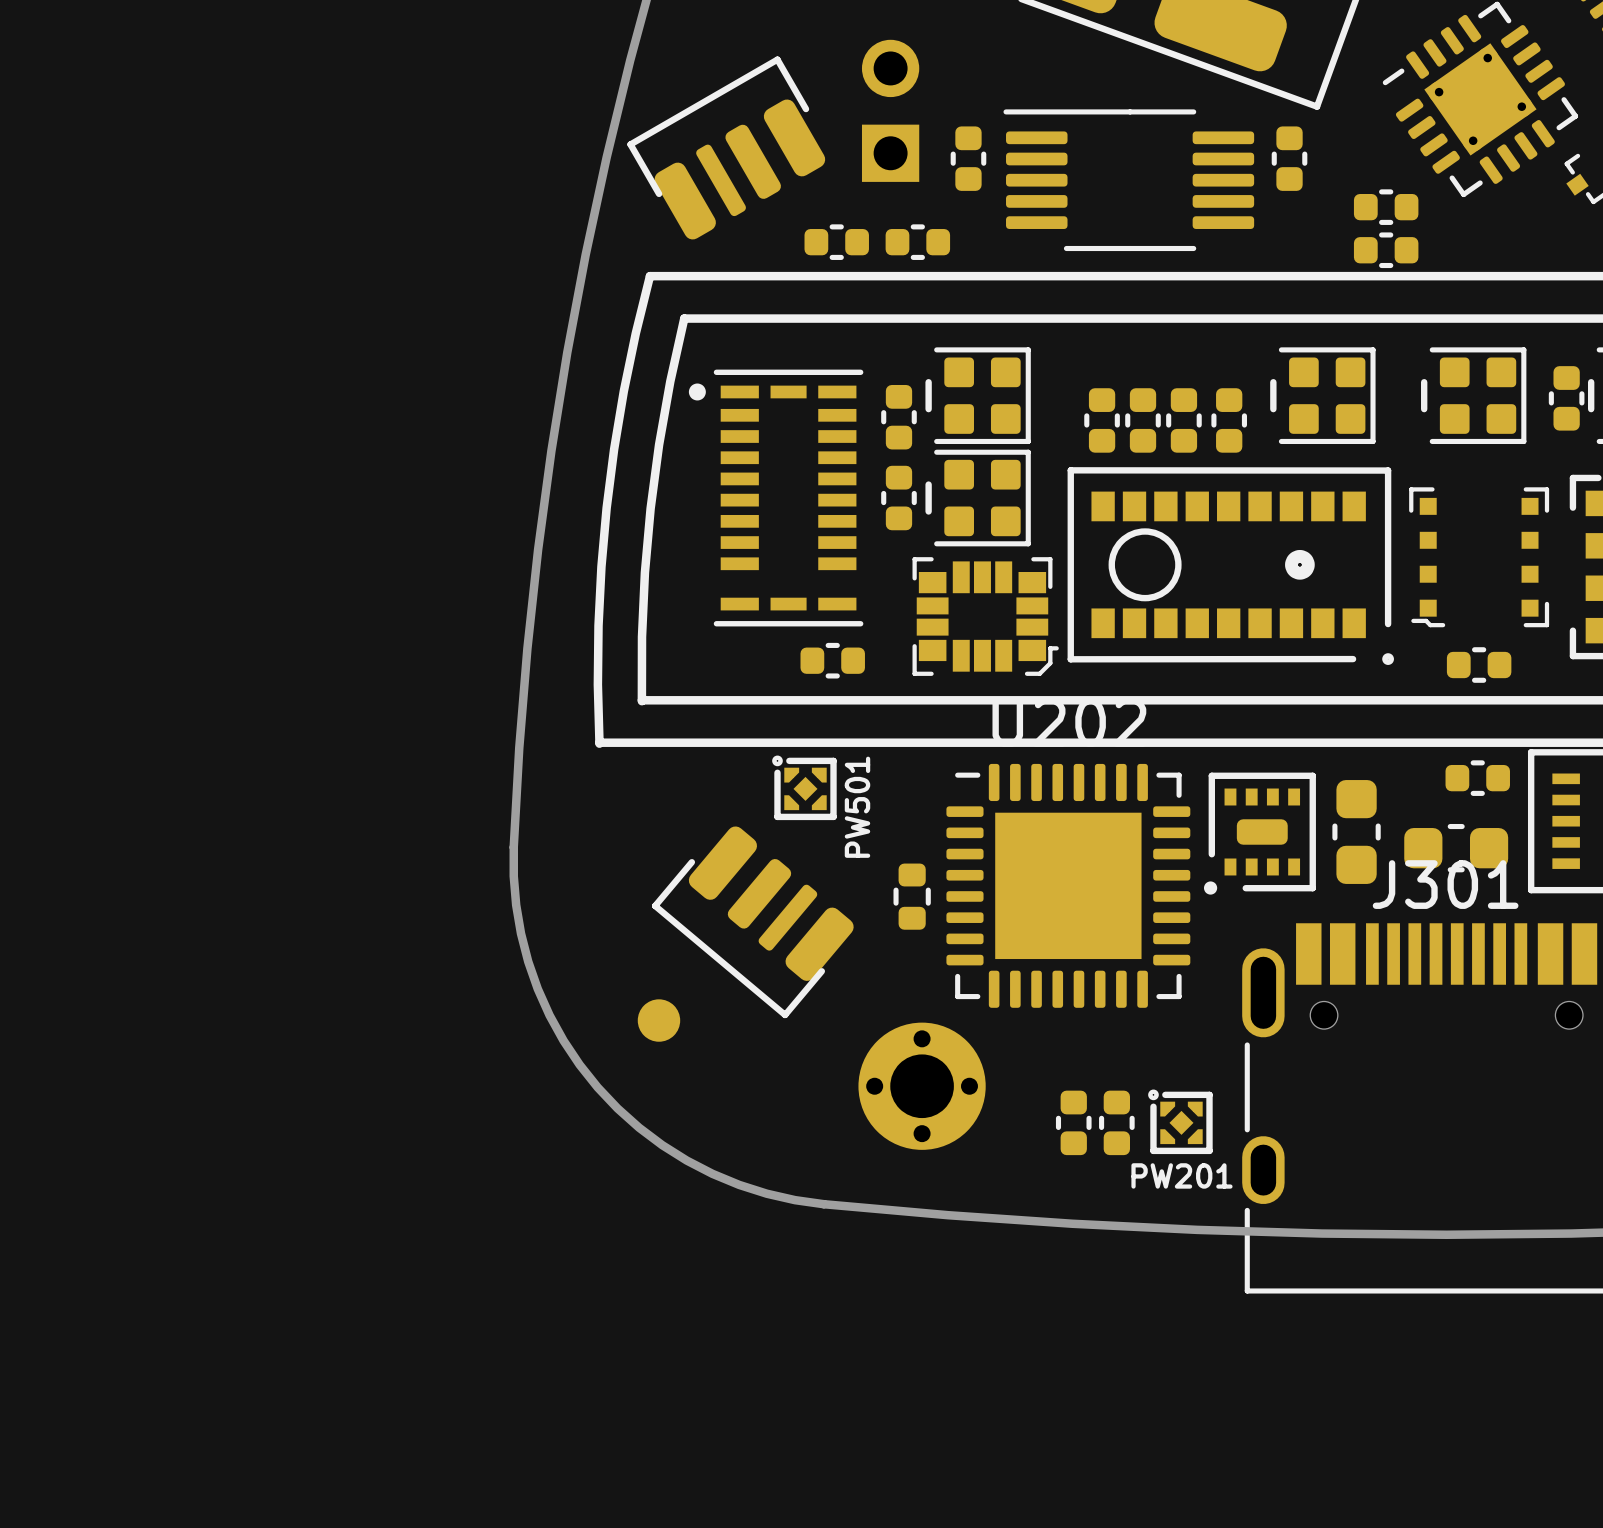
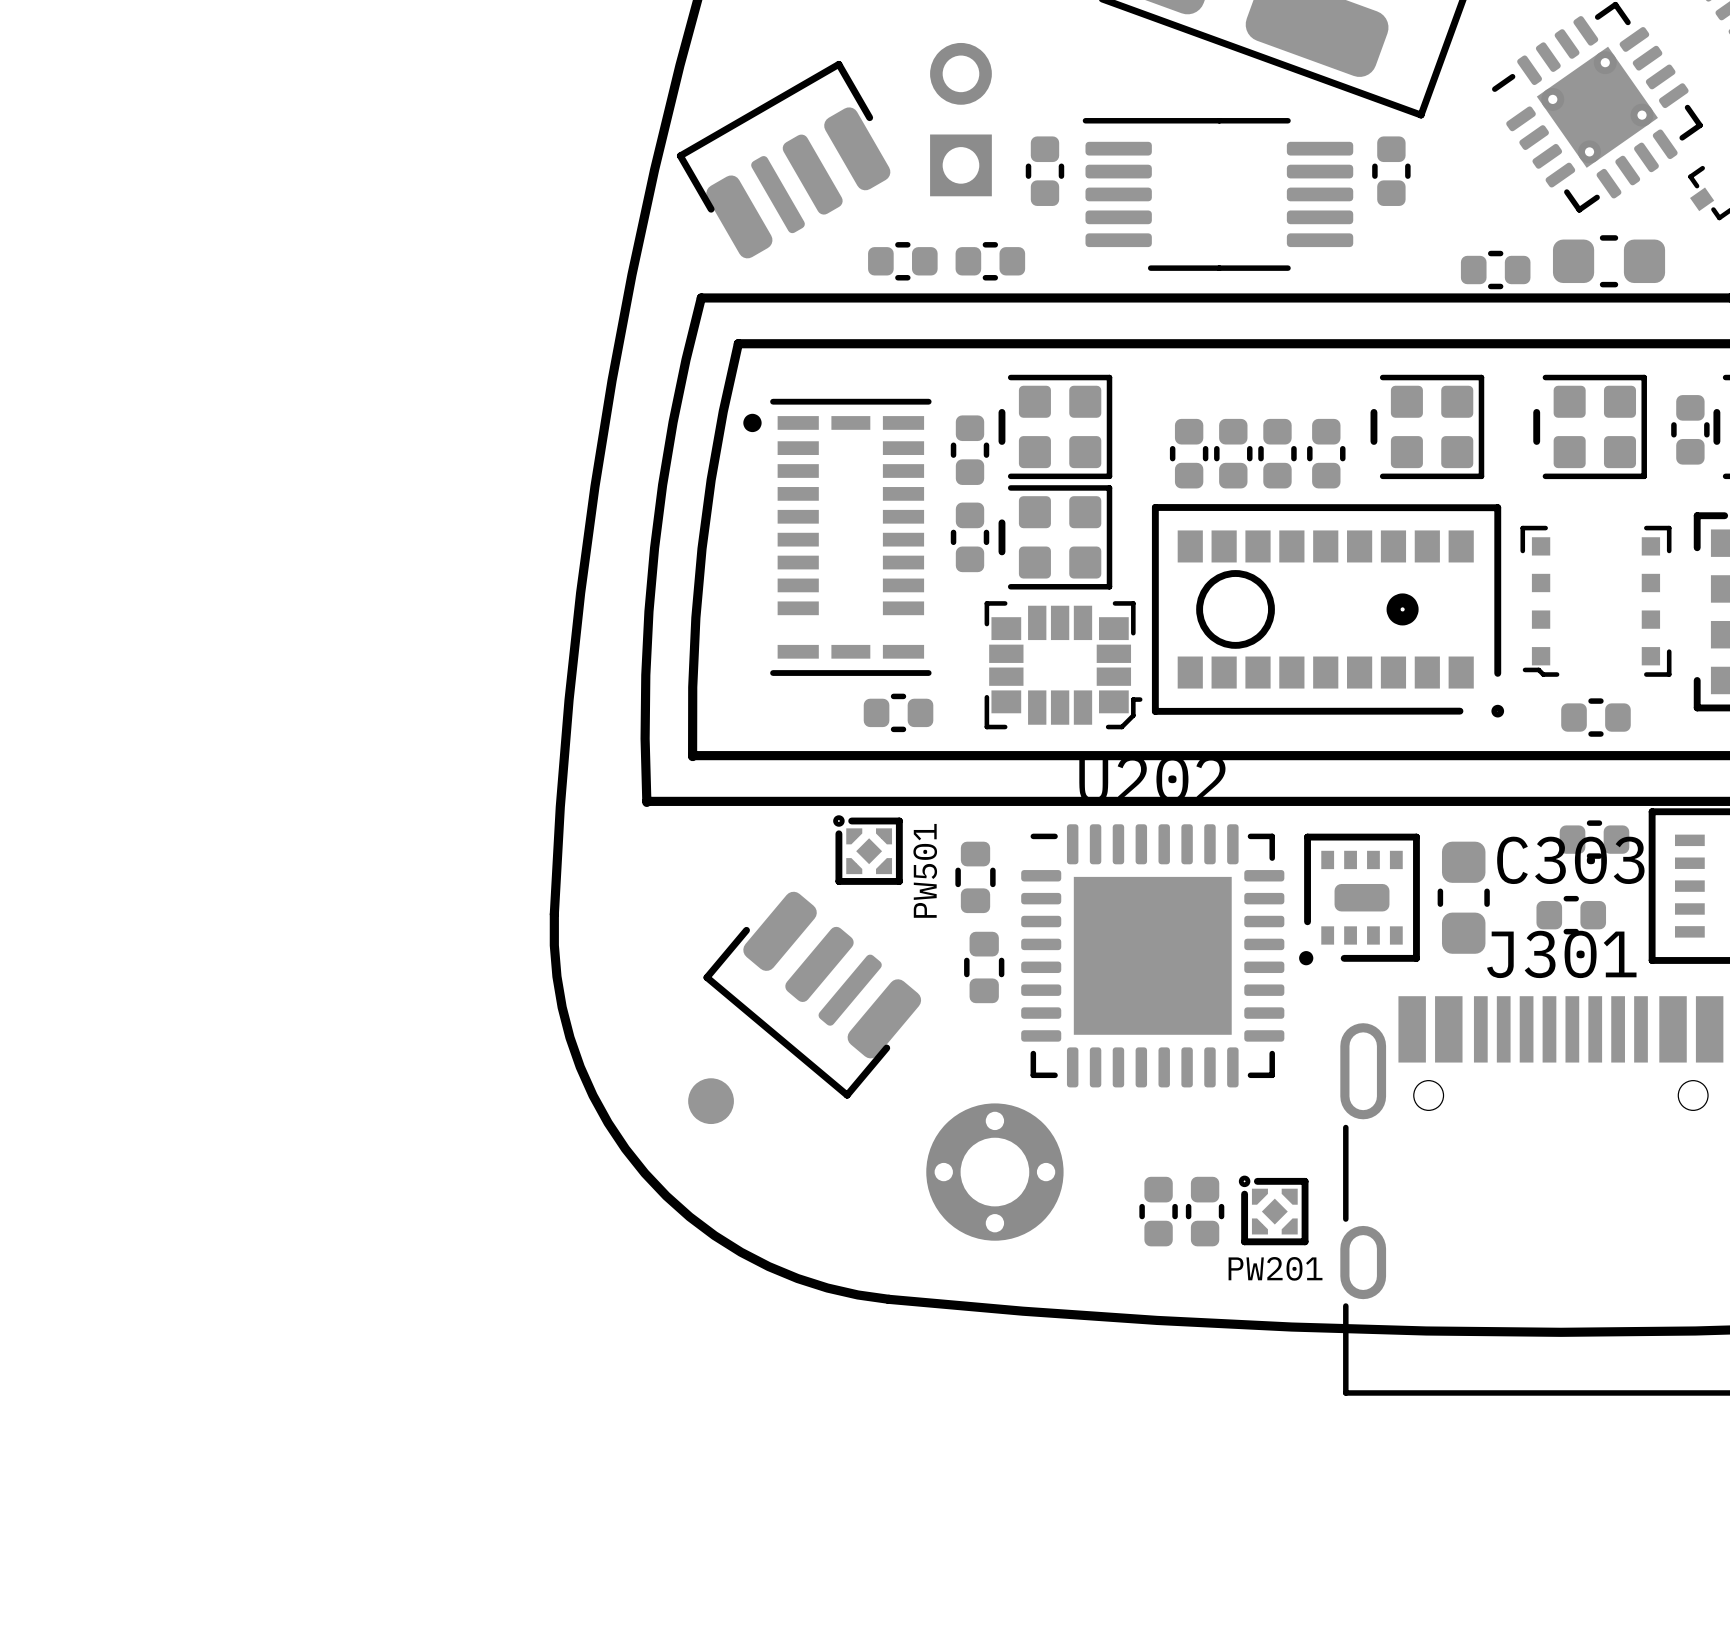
part: (1386, 207) -> none
part: none -> (975, 877)
part position: (1456, 848) -> (1609, 261)
C303: none -> (1571, 915)

